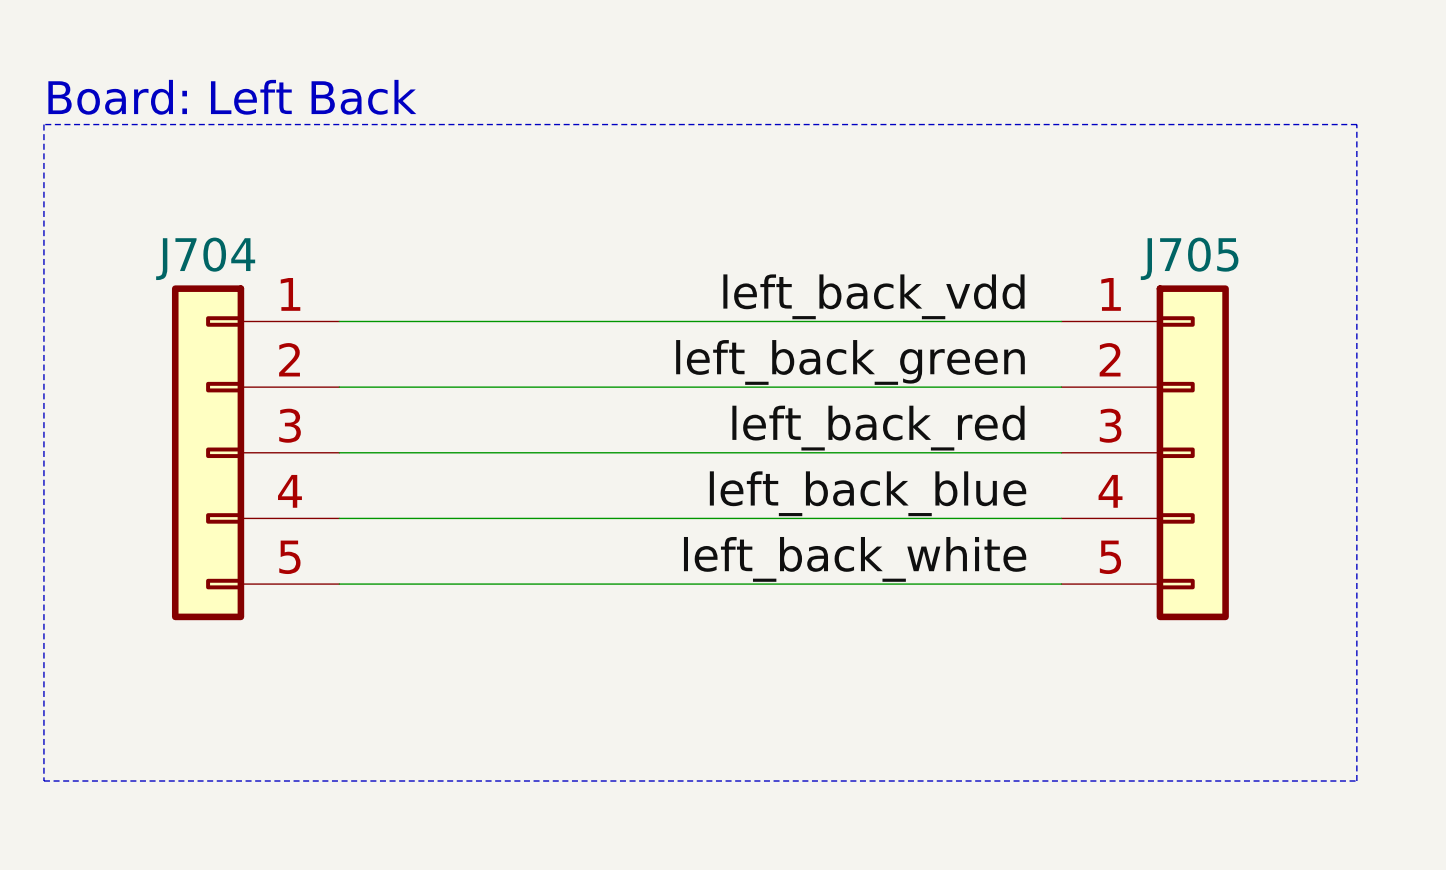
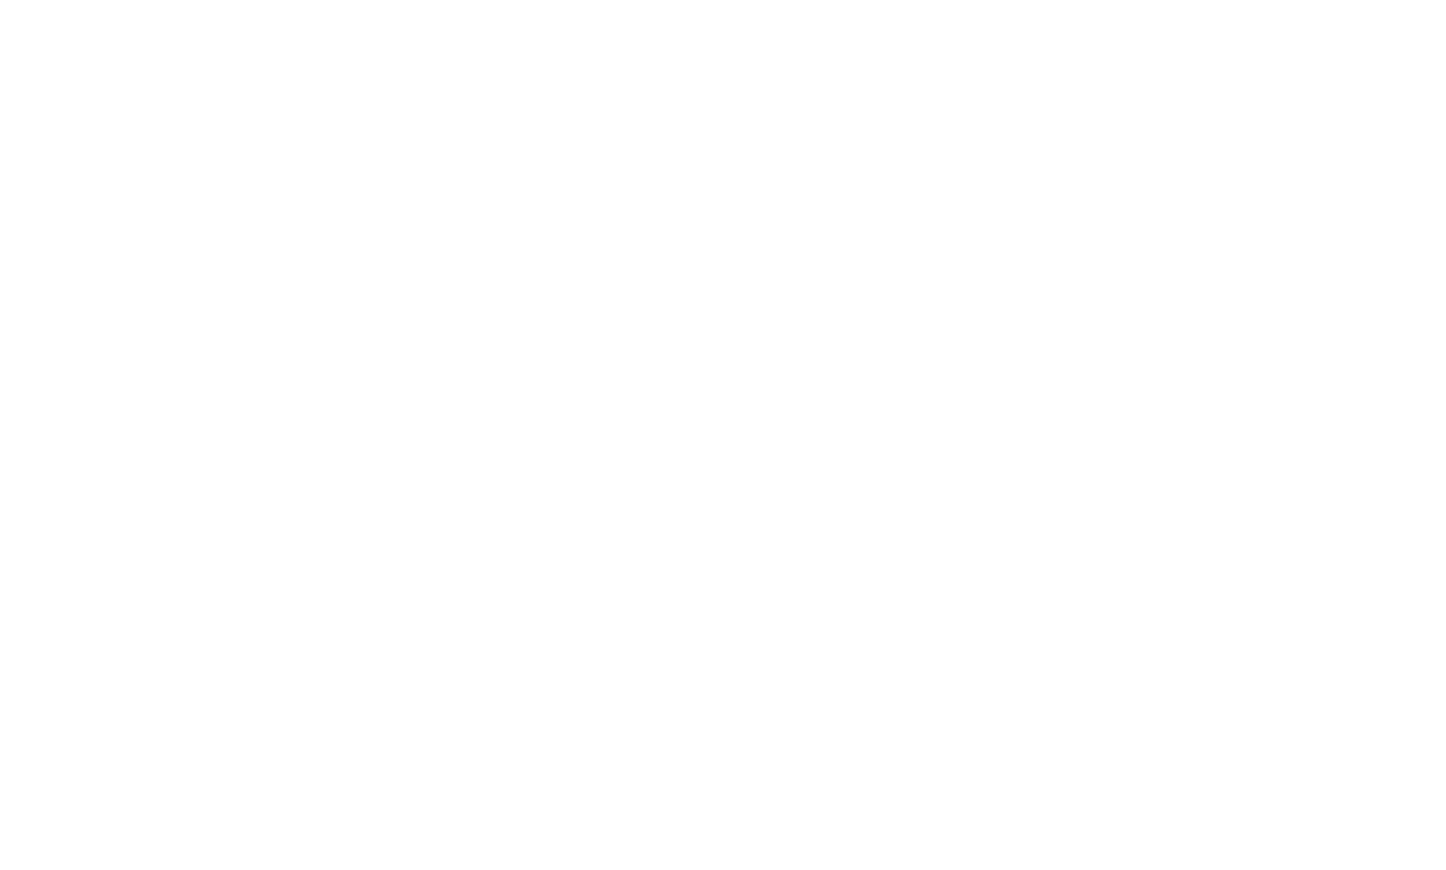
text: Board: Left Back (232, 97) -> none
line: (43, 124) (43, 781) (1356, 781) (1356, 124) (43, 124) -> none
label: left_back_vdd (873, 296) -> none
wire: (339, 321) (1061, 321) -> none
label: left_back_green (850, 362) -> none
wire: (339, 387) (1061, 387) -> none
label: left_back_red (878, 428) -> none
J704: (255, 452) -> none
wire: (339, 452) (1061, 452) -> none
J705: (1145, 452) -> none
label: left_back_blue (868, 493) -> none
wire: (339, 518) (1061, 518) -> none
label: left_back_white (855, 559) -> none
wire: (339, 584) (1061, 584) -> none

